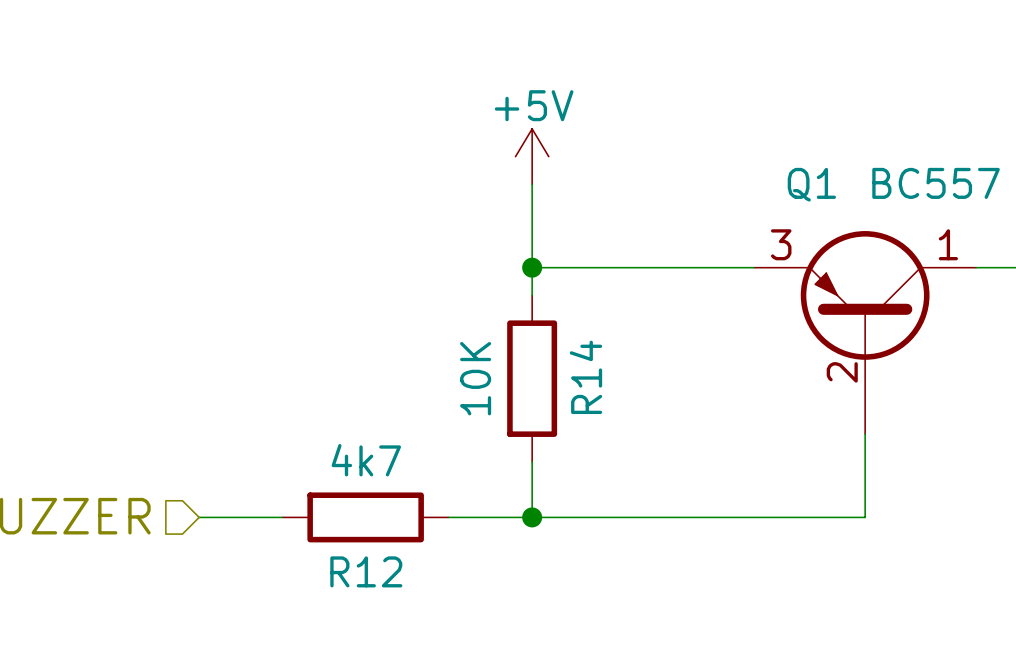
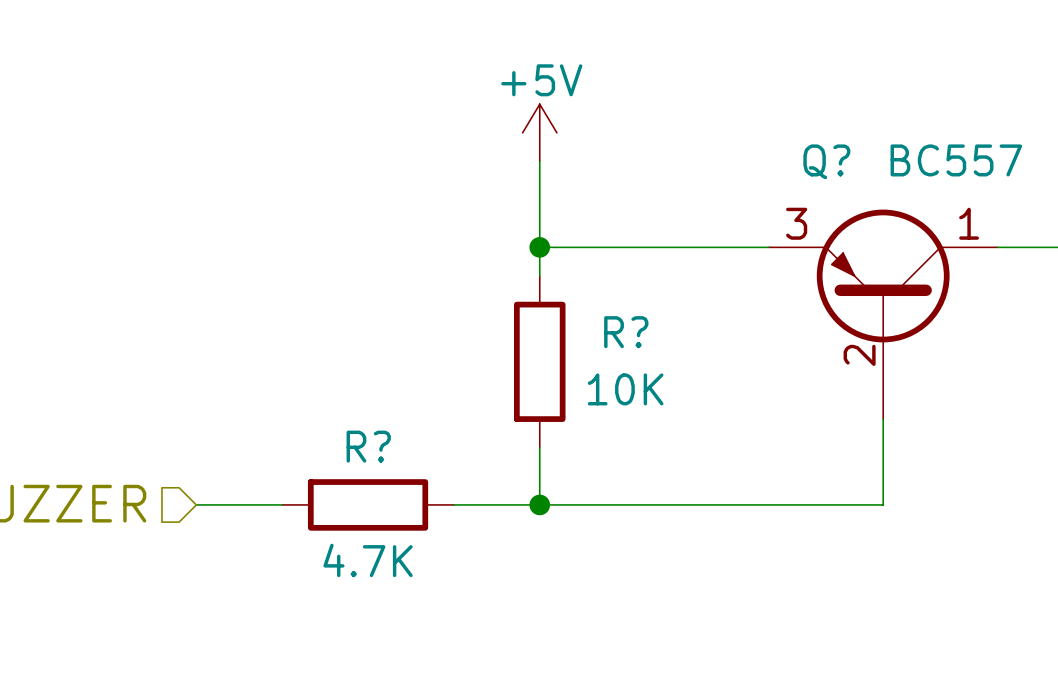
Q1 name: Q1 (811, 184) -> Q? (826, 161)
R14 name: R14 (585, 377) -> R? (626, 332)
R14 value rotation: 0° (475, 378) -> 90° clockwise (625, 389)
R14 value position: 10K (475, 378) -> 10K (625, 389)
R12 value: 4k7 (366, 460) -> 4.7K (368, 560)
R12 name: R12 (366, 571) -> R? (368, 446)

